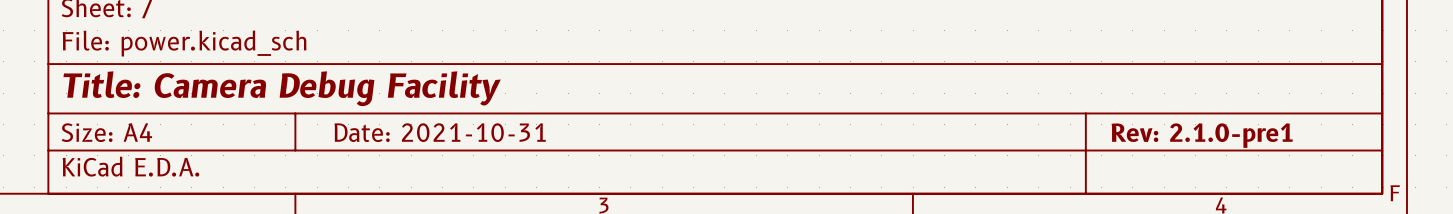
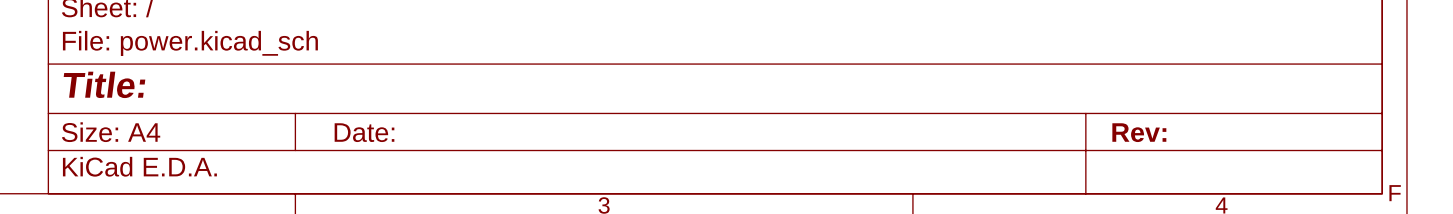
title block: Title: Camera Debug Facility (282, 88) -> Title: (104, 84)
title block: Date: 2021-10-31 (440, 132) -> Date: (364, 132)
title block: Rev: 2.1.0-pre1 (1202, 135) -> Rev: (1139, 132)

